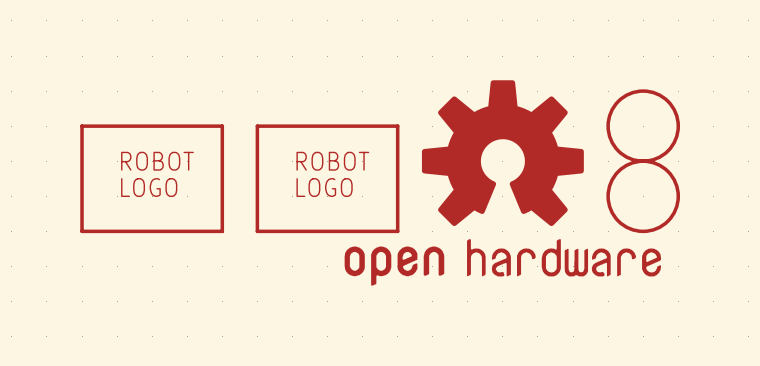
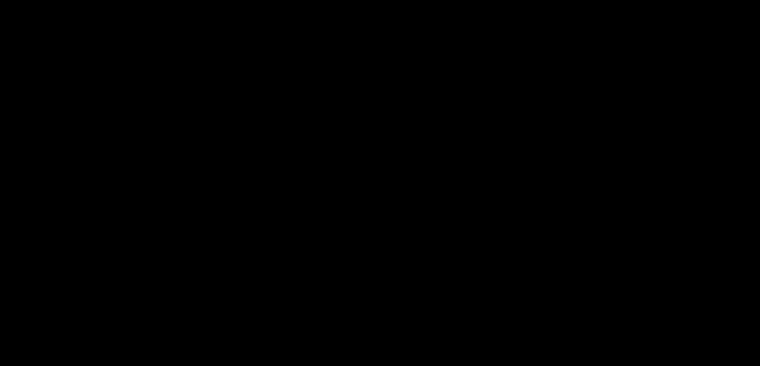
part: (643, 126) -> none
part: (152, 178) -> none
part: (327, 178) -> none
part: (502, 182) -> none
part: (643, 196) -> none

